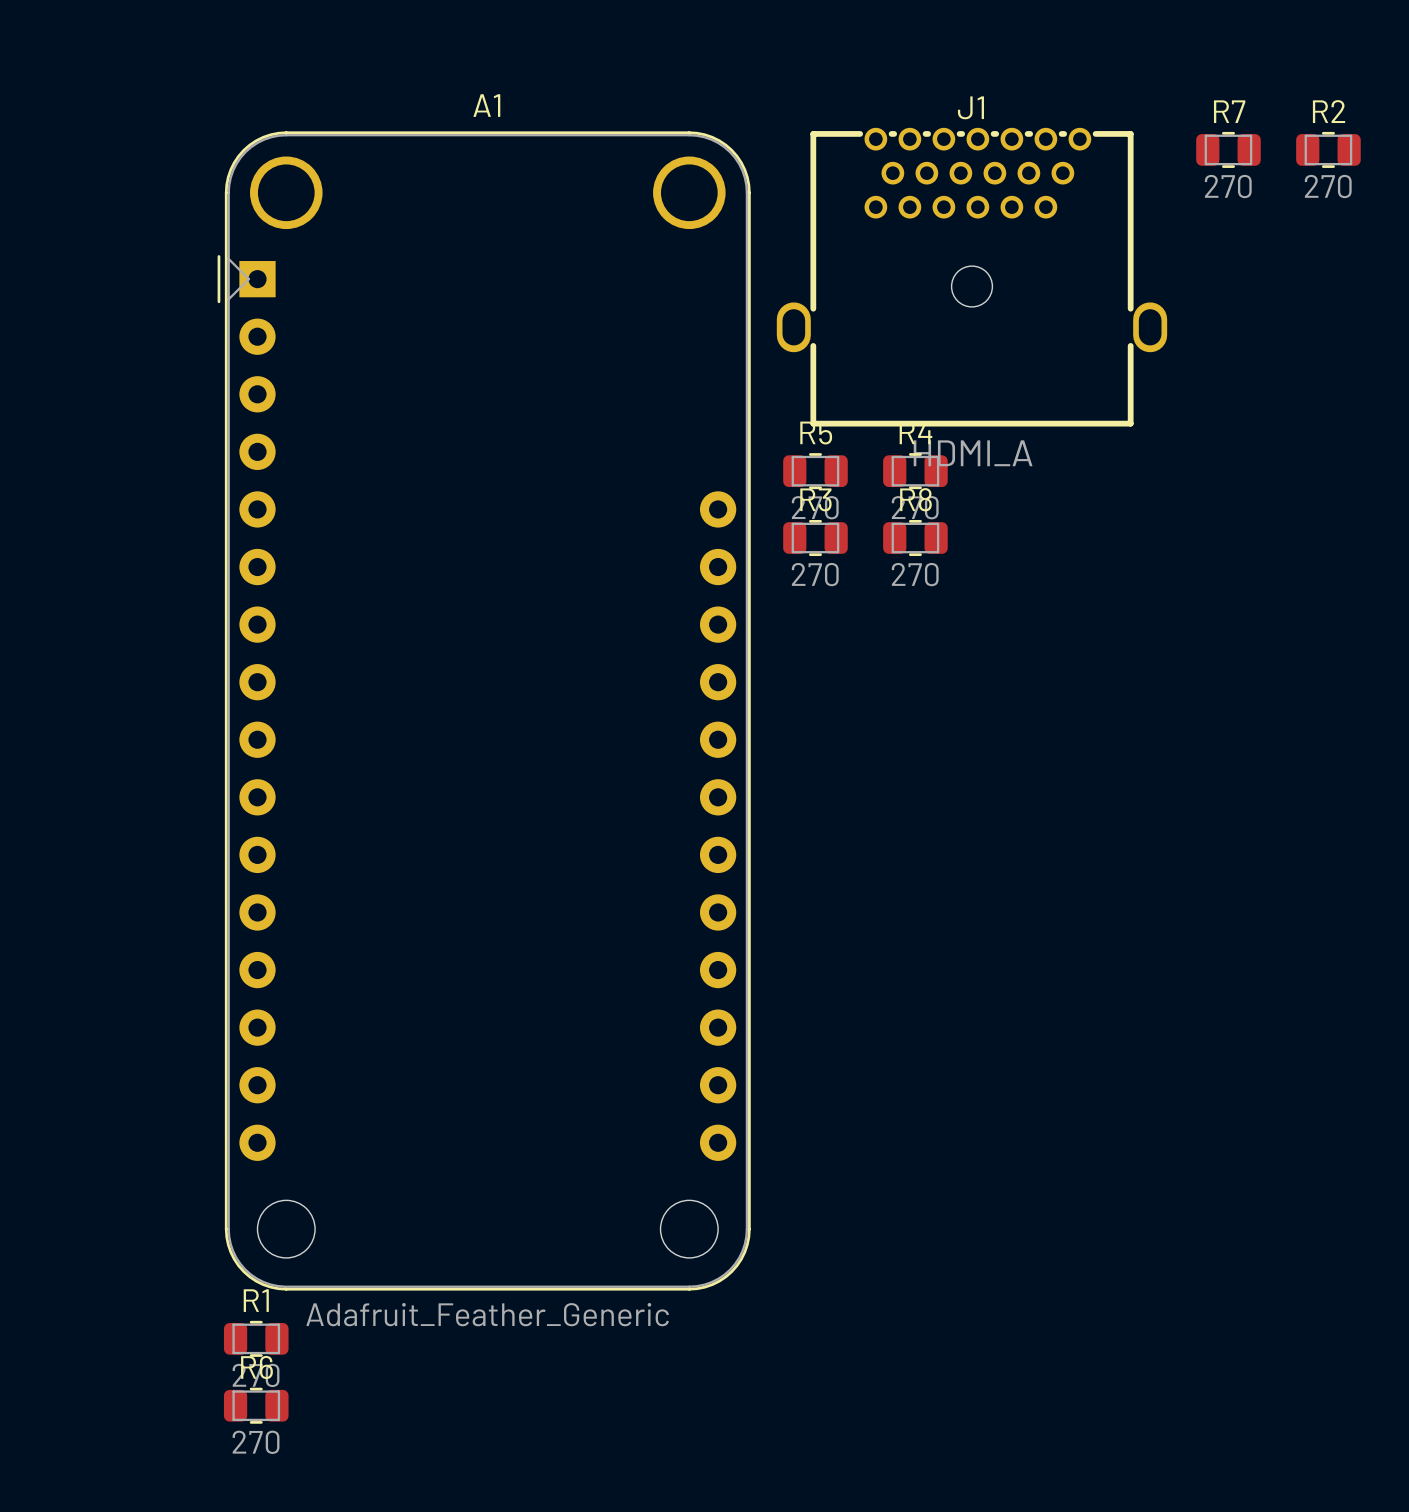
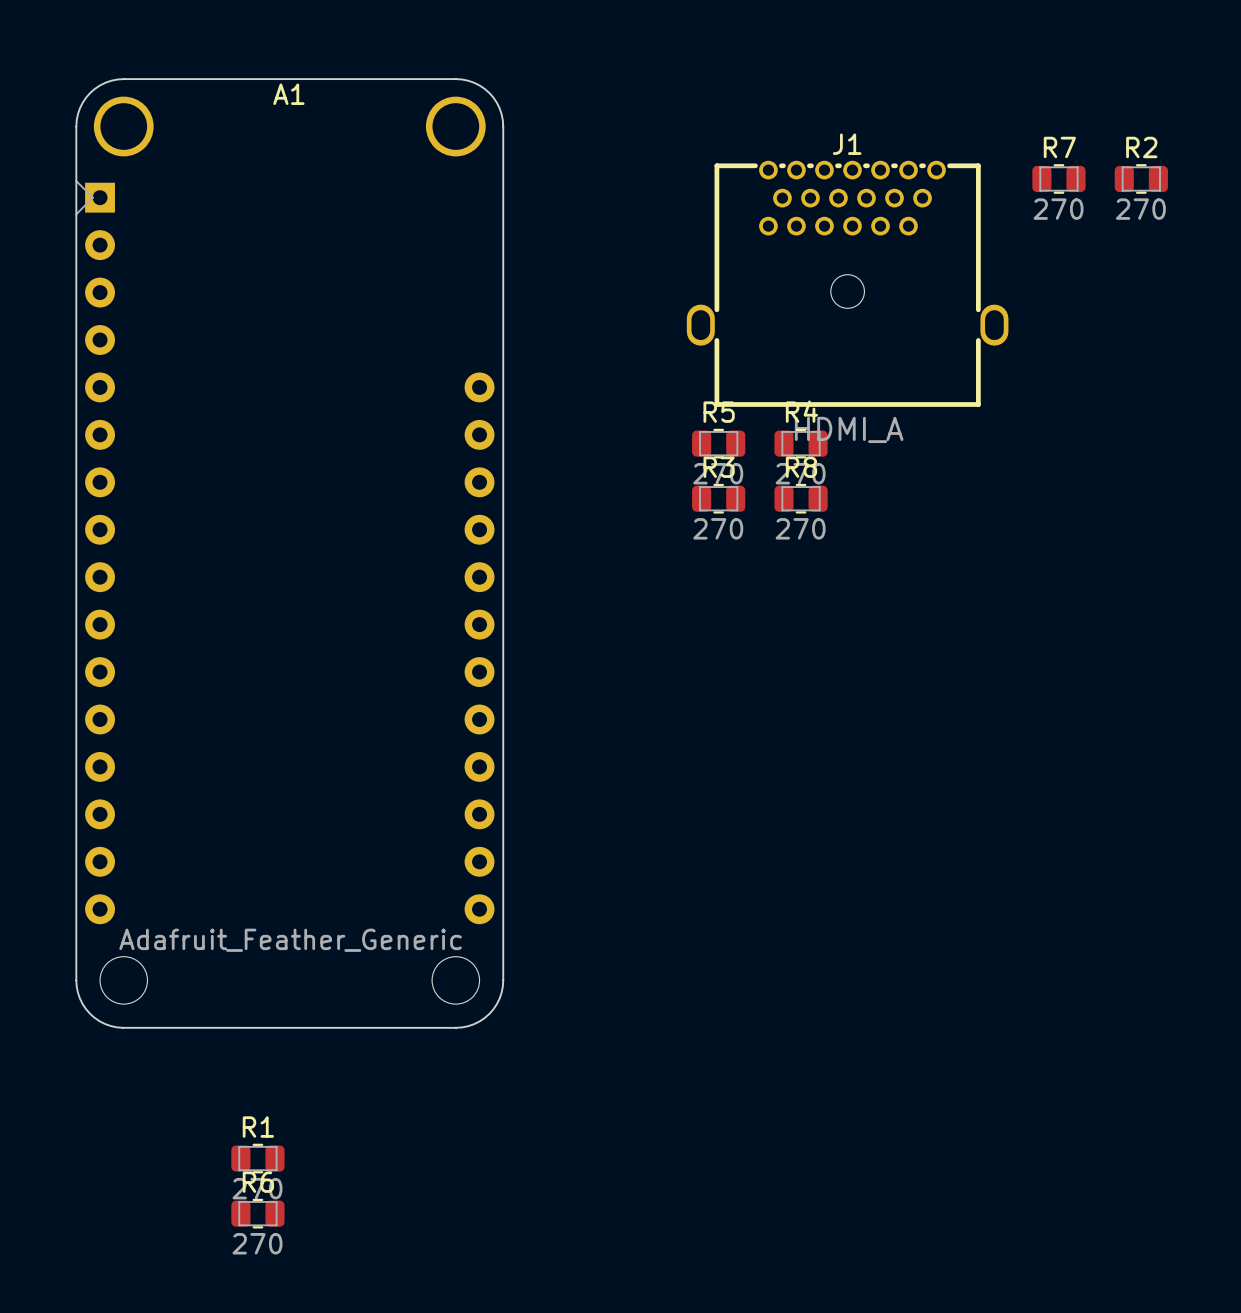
A1 name position: A1 (486, 105) -> A1 (288, 94)
A1 footprint: [217, 131, 751, 1291] -> [75, 78, 505, 1029]
A1 value position: Adafruit_Feather_Generic (487, 1314) -> Adafruit_Feather_Generic (290, 940)

